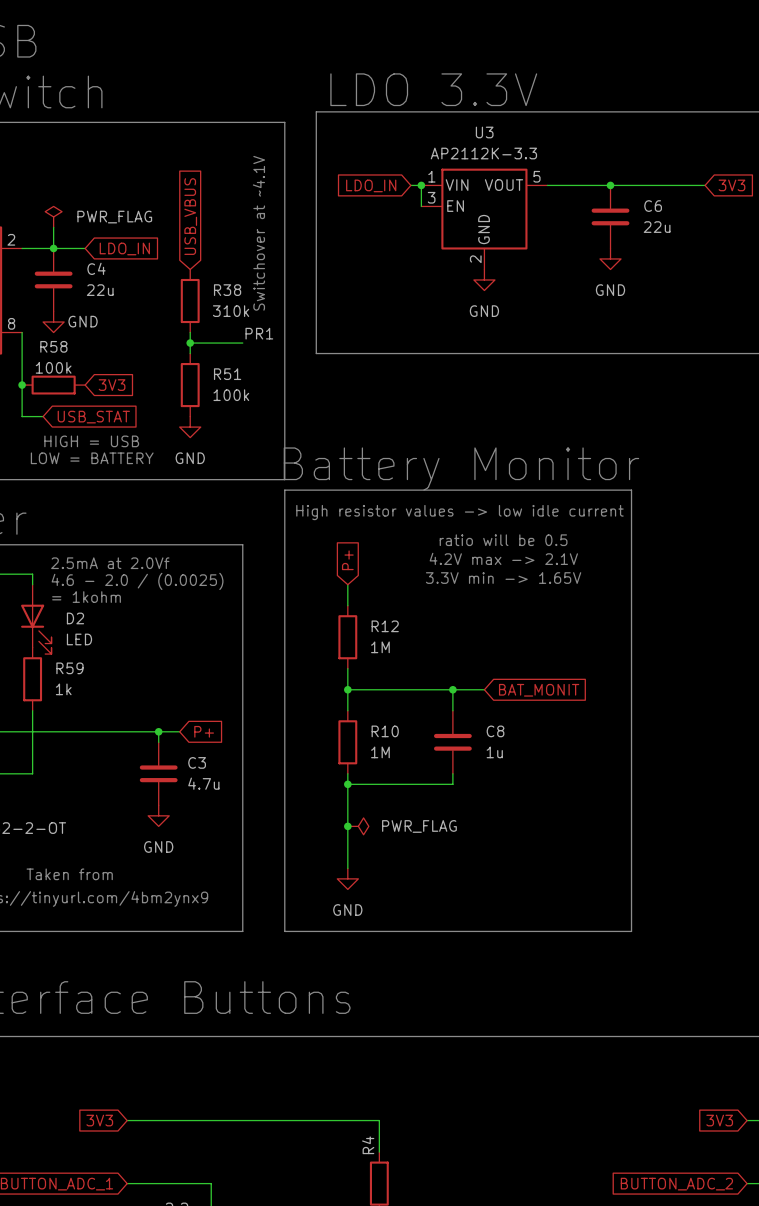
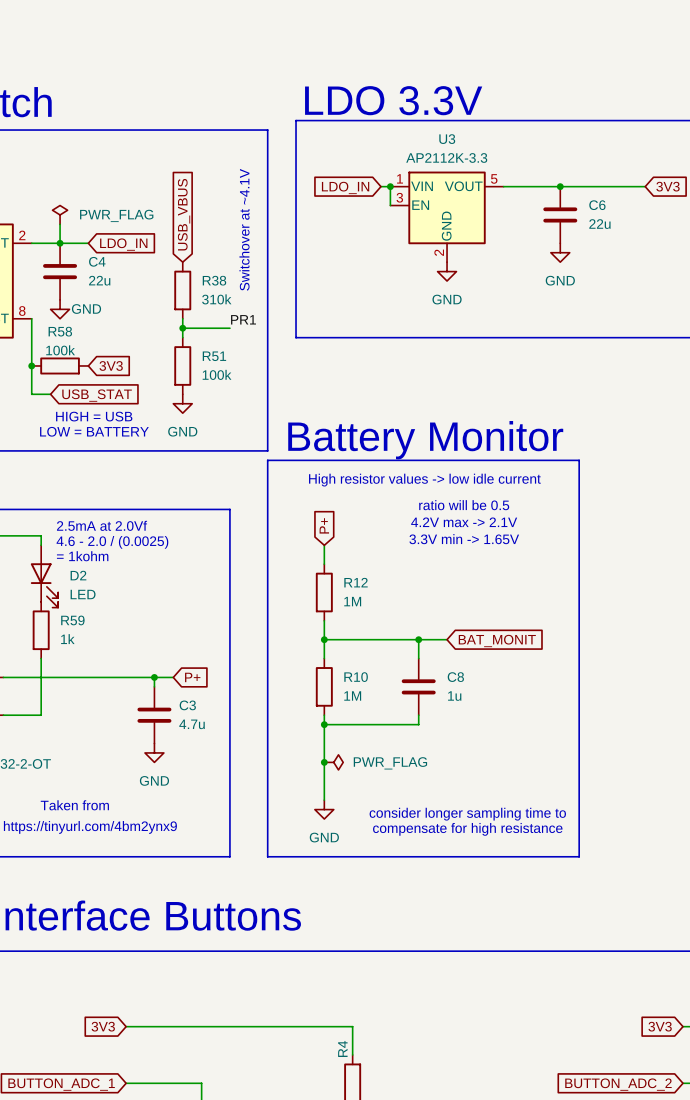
text: none -> consider longer sampling time to (467, 814)
text: none -> compensate for high resistance (467, 829)

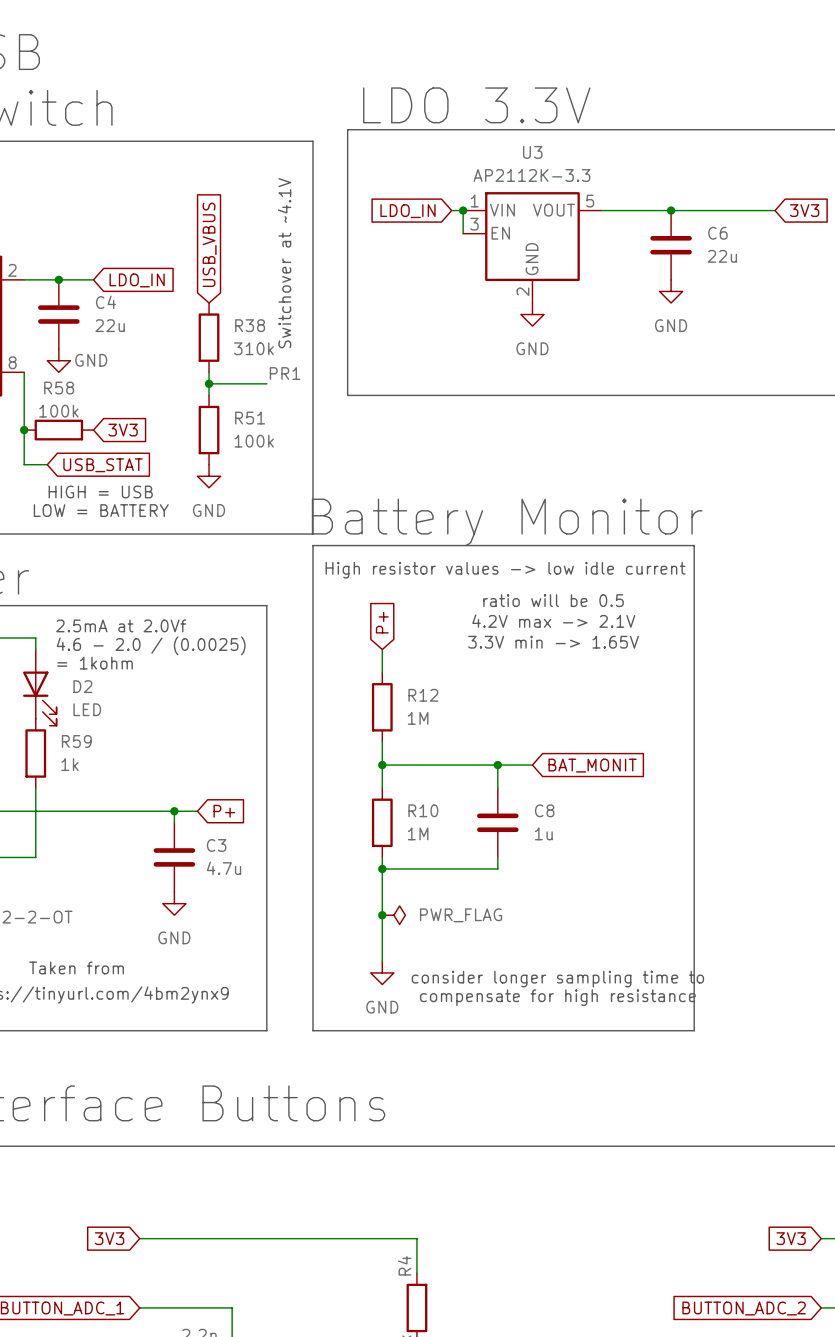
power symbol: PWR_FLAG (60, 214) -> none
wire: (60, 224) (60, 243) -> none

